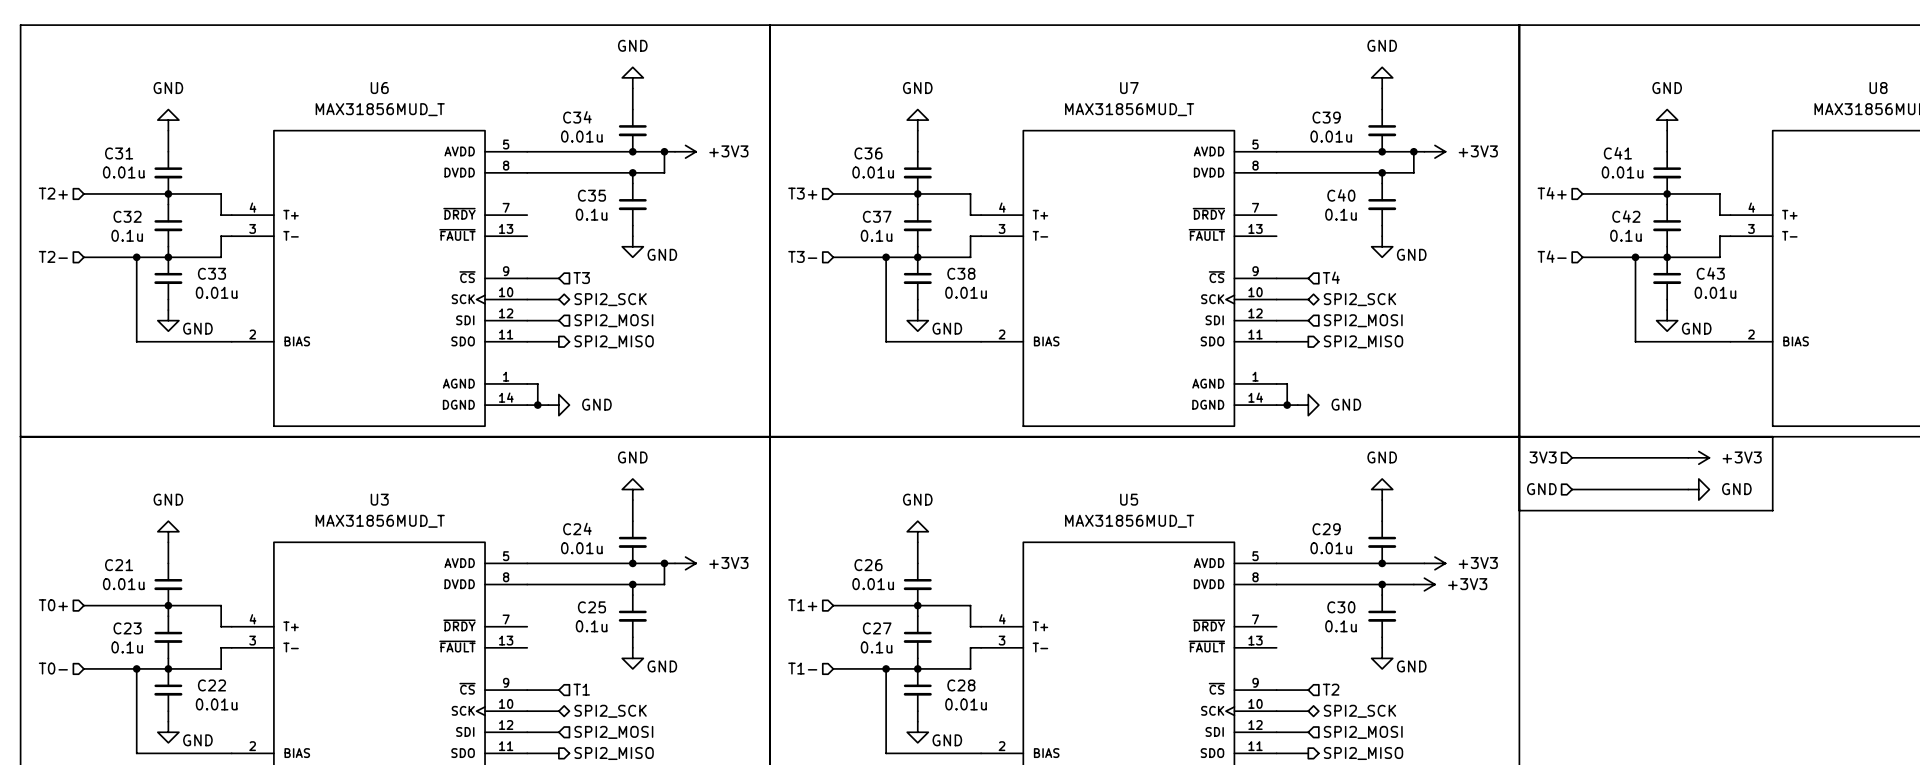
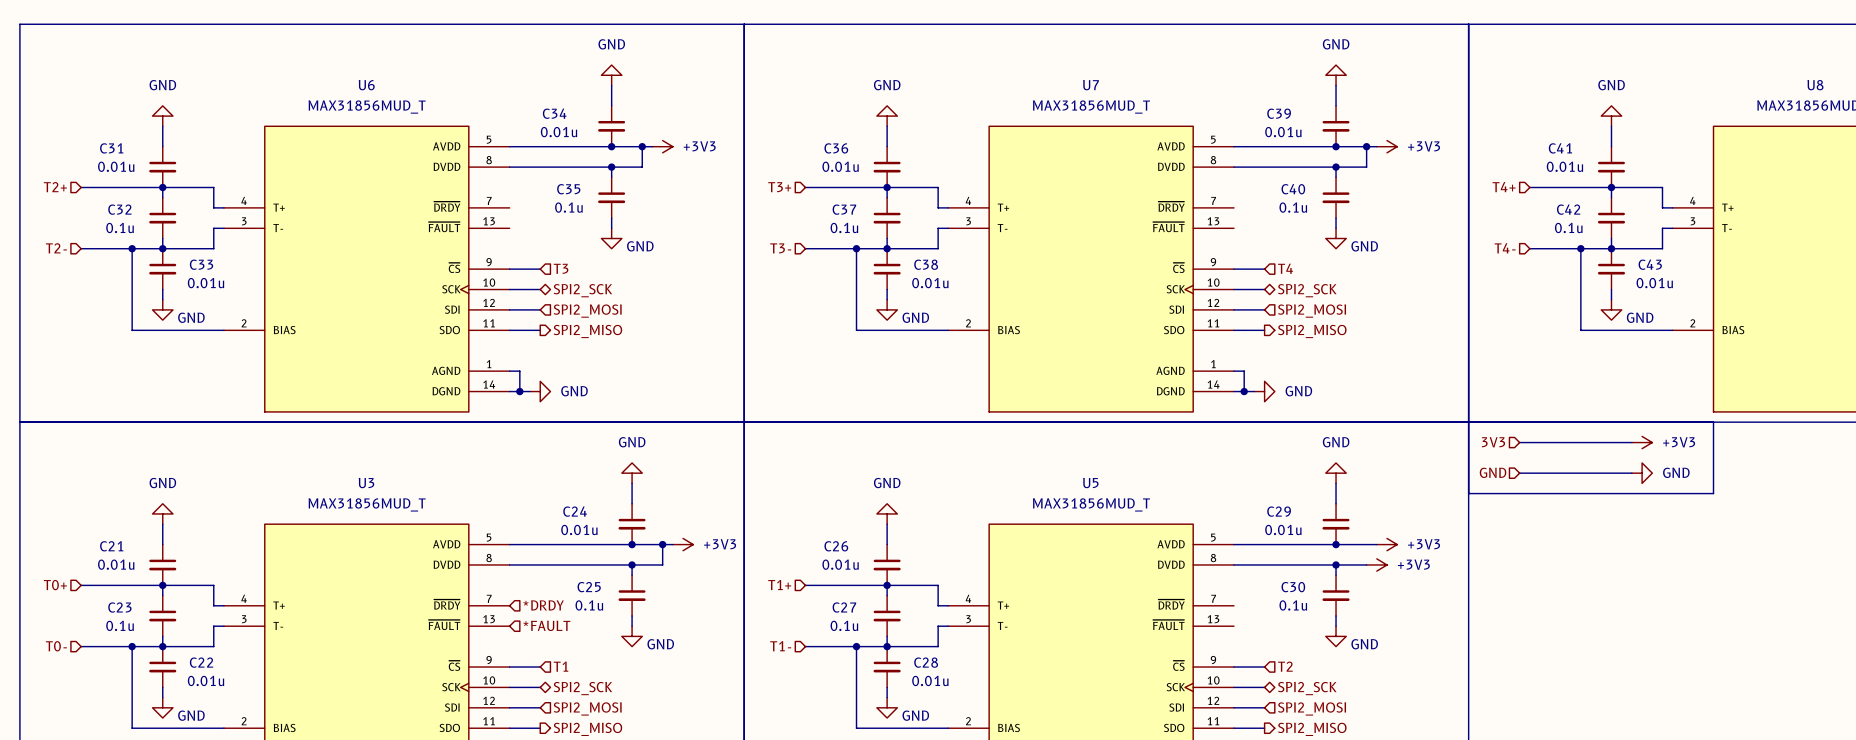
power symbol position: GND (632, 489) -> GND (632, 473)
wire: (632, 500) (632, 521) -> (632, 483) (632, 503)
C24 position: (632, 542) -> (632, 524)
junction: (632, 563) -> none
junction: none -> (632, 544)
wire: (664, 563) (664, 584) -> (662, 544) (662, 564) (642, 564)
junction: (664, 563) -> none
junction: none -> (662, 544)
power symbol position: +3V3 (685, 563) -> +3V3 (683, 544)
wire: (632, 584) (632, 595) -> (632, 564) (632, 575)
junction: (632, 584) -> none
junction: none -> (632, 564)
C25 position: (632, 616) -> (632, 595)
hierarchical label: none -> *DRDY (543, 605)
wire: (632, 637) (632, 647) -> (632, 616) (632, 626)
hierarchical label: none -> *FAULT (546, 625)
power symbol position: GND (632, 658) -> GND (632, 636)

